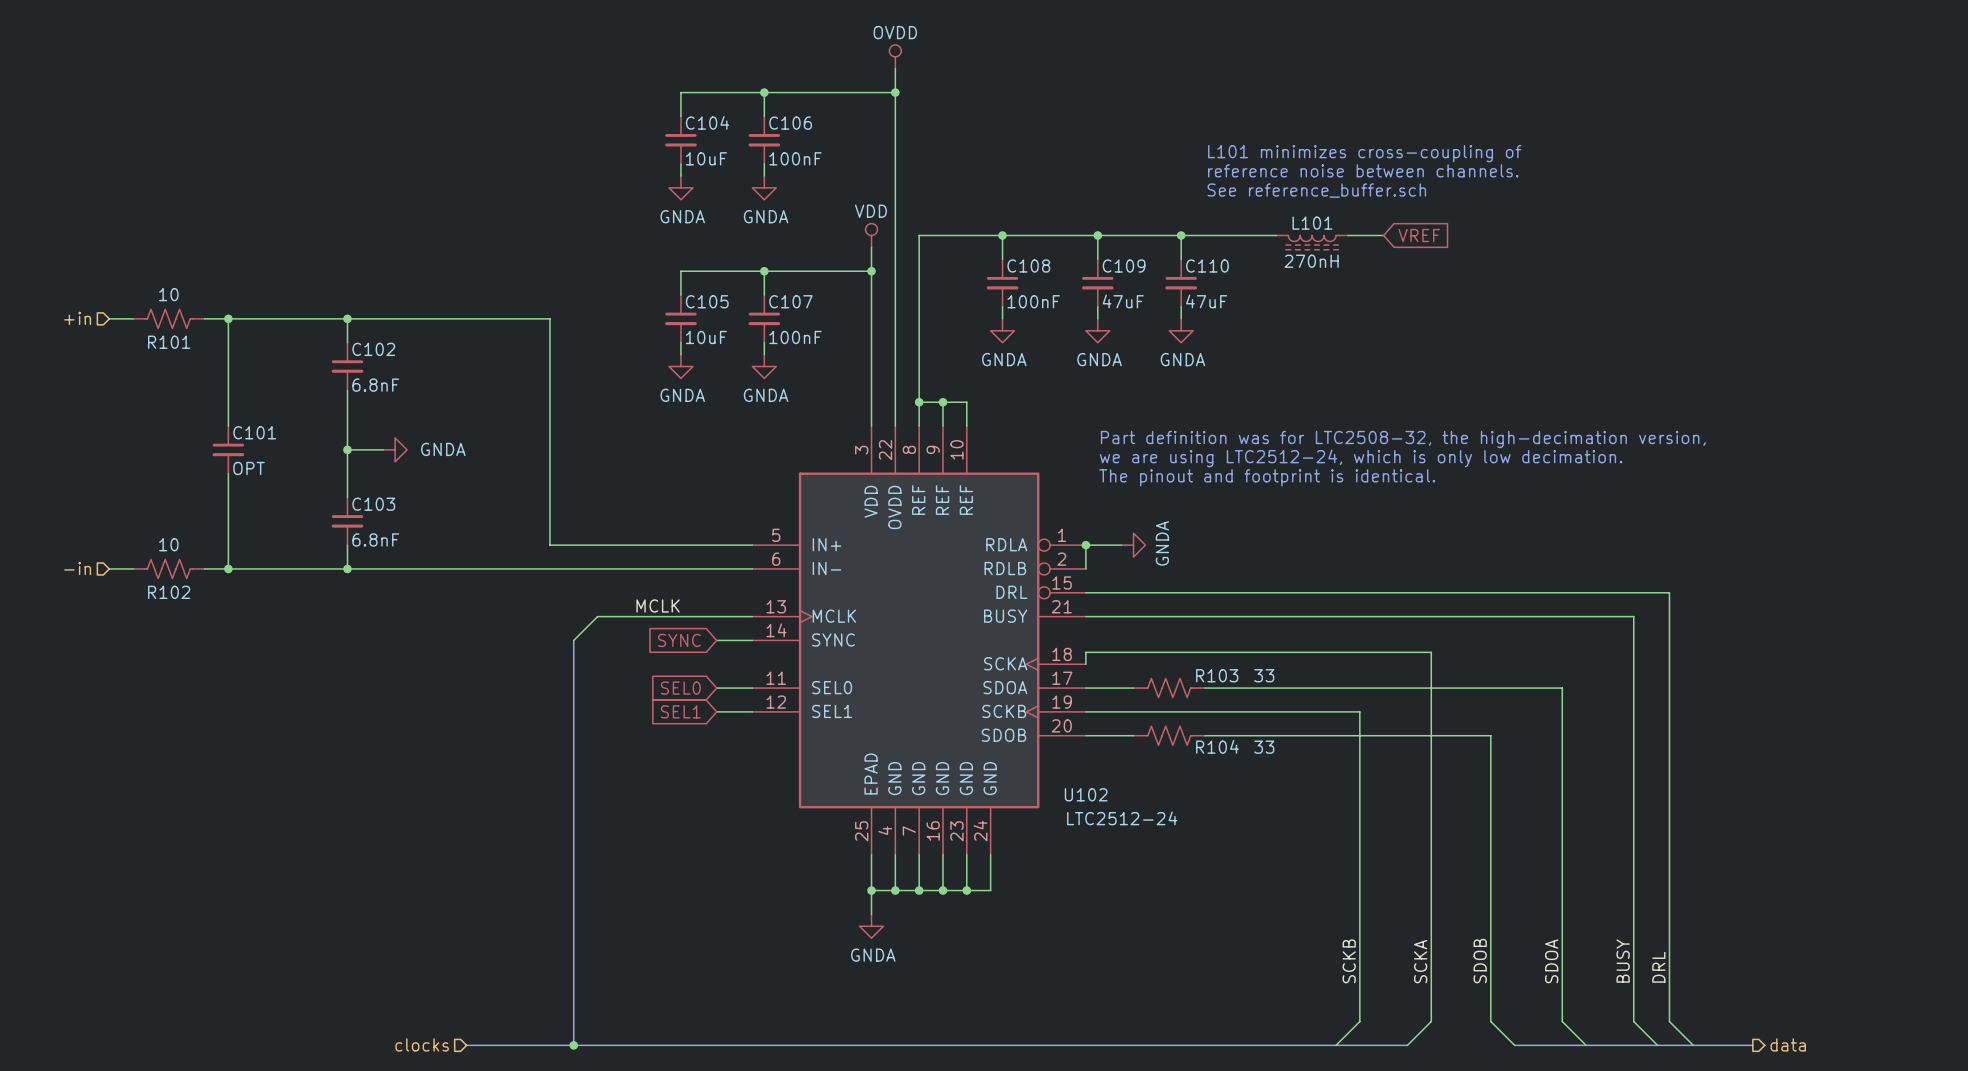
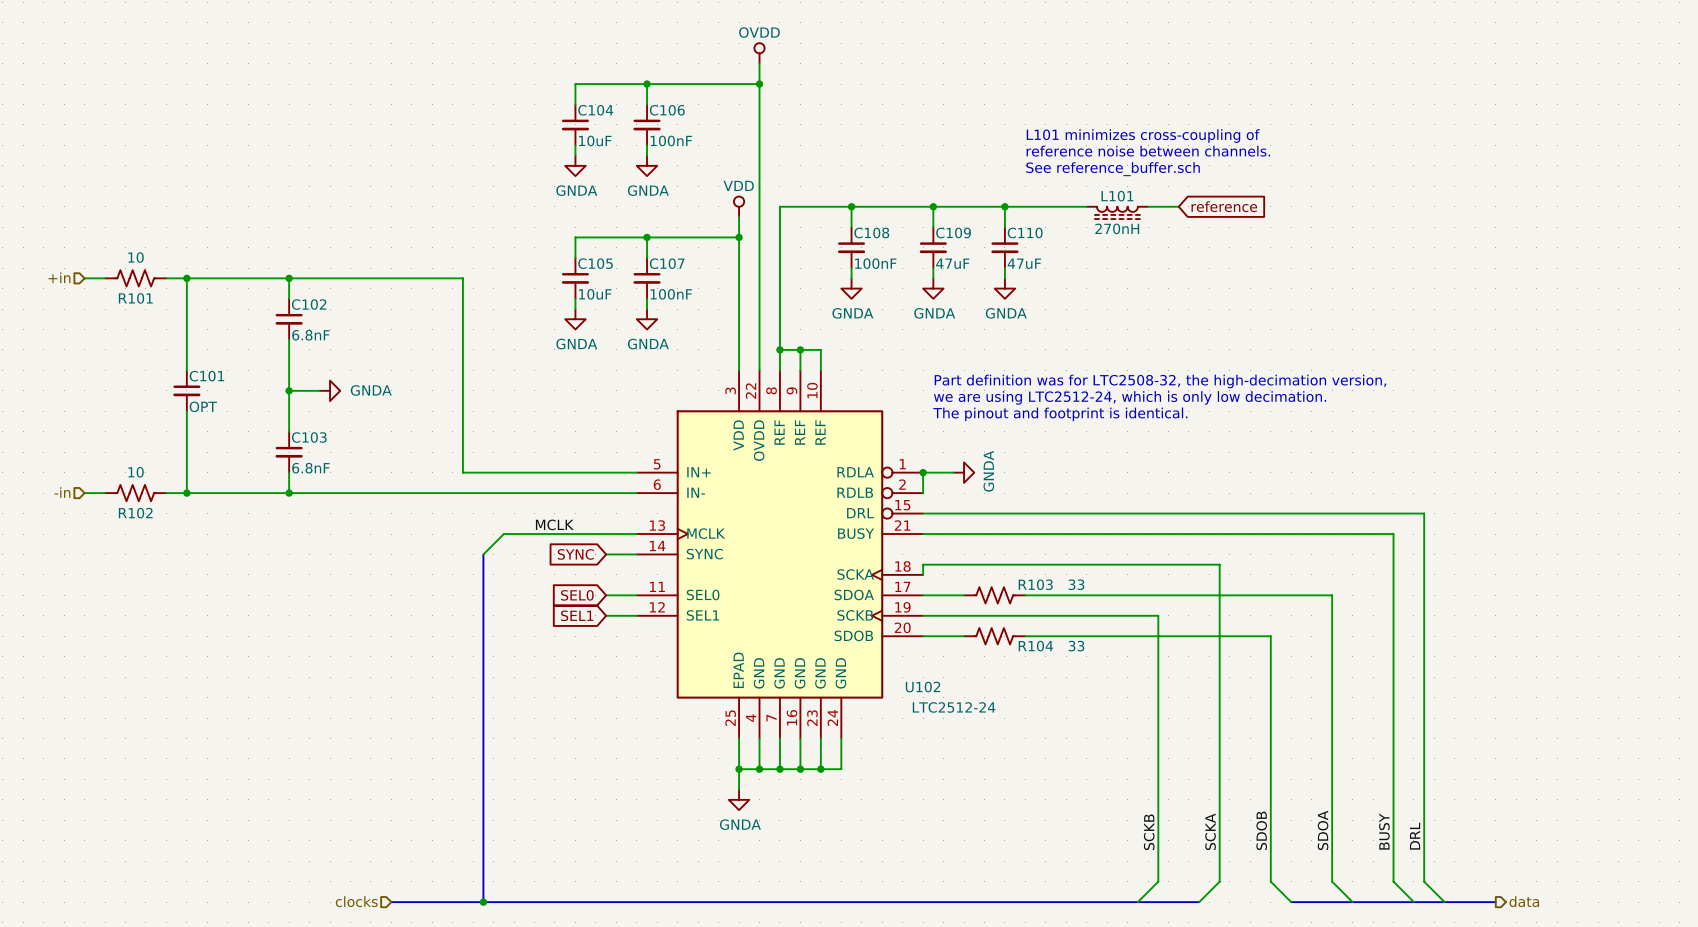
global label: VREF (1419, 235) -> reference (1224, 206)

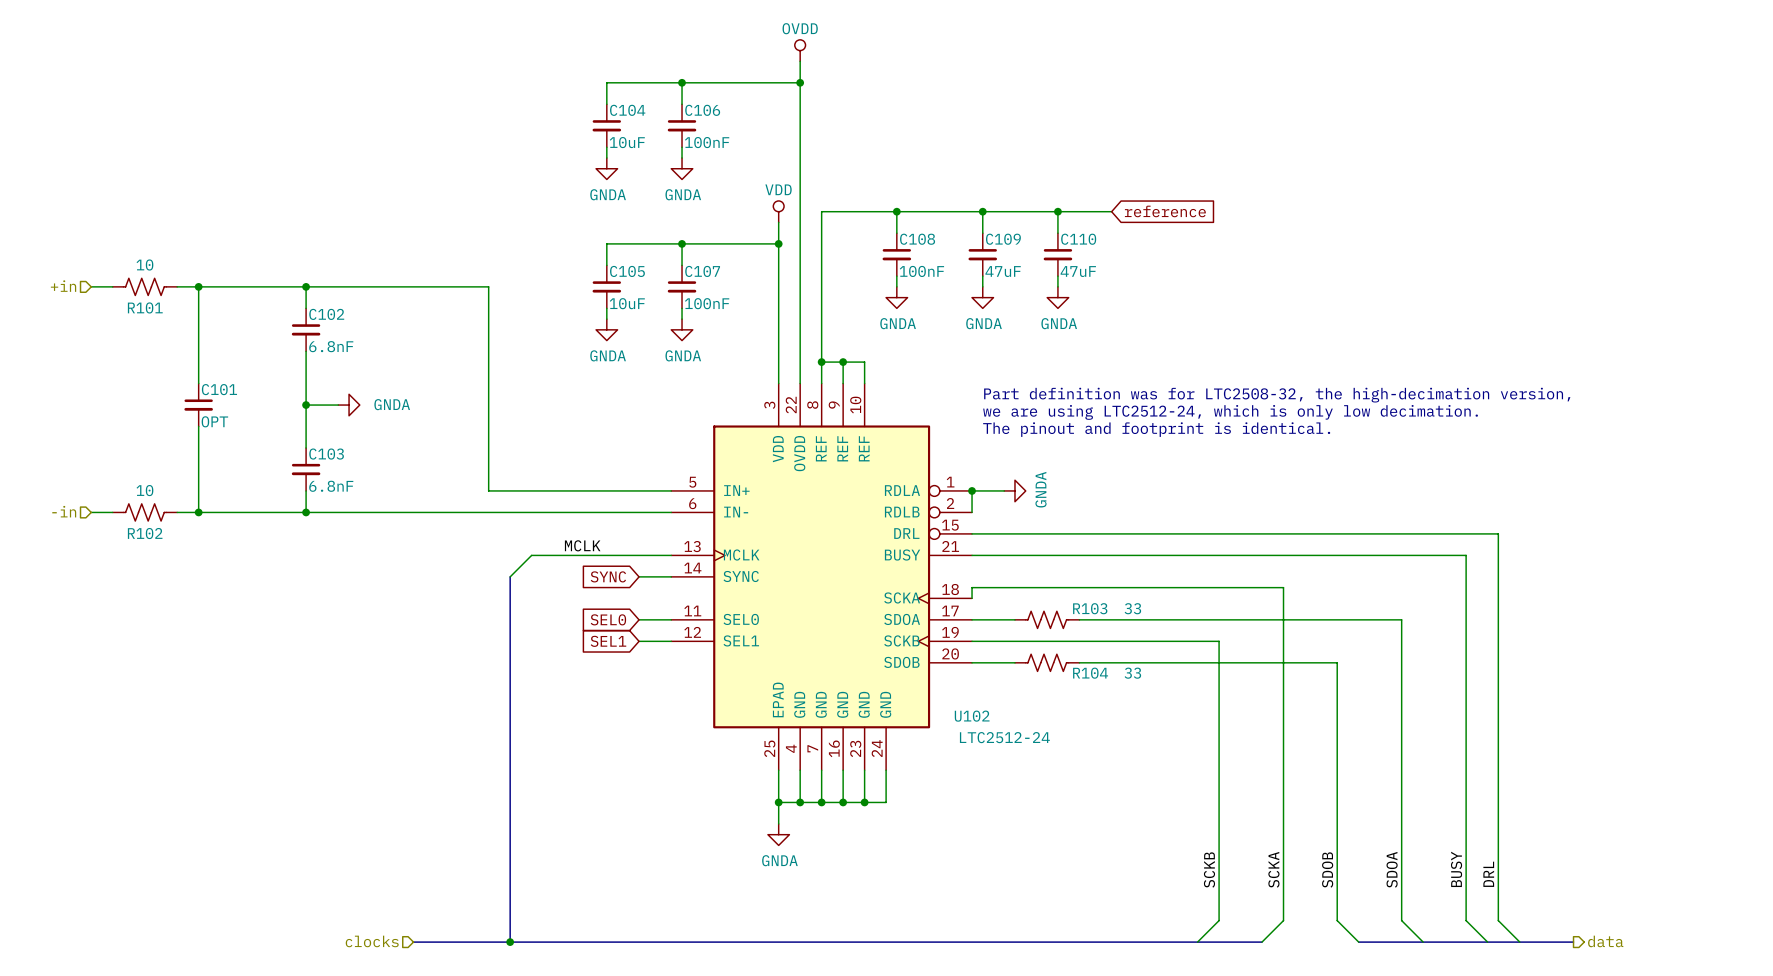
text: L101 minimizes cross-coupling of (1143, 136) -> none
text: reference noise between channels. (1148, 151) -> none
text: See reference_buffer.sch (1113, 169) -> none
wire: (1056, 206) (1086, 206) -> none
wire: (1148, 206) (1178, 206) -> none
global label position: reference (1224, 206) -> reference (1165, 211)
L101: 270nH (1117, 212) -> none

